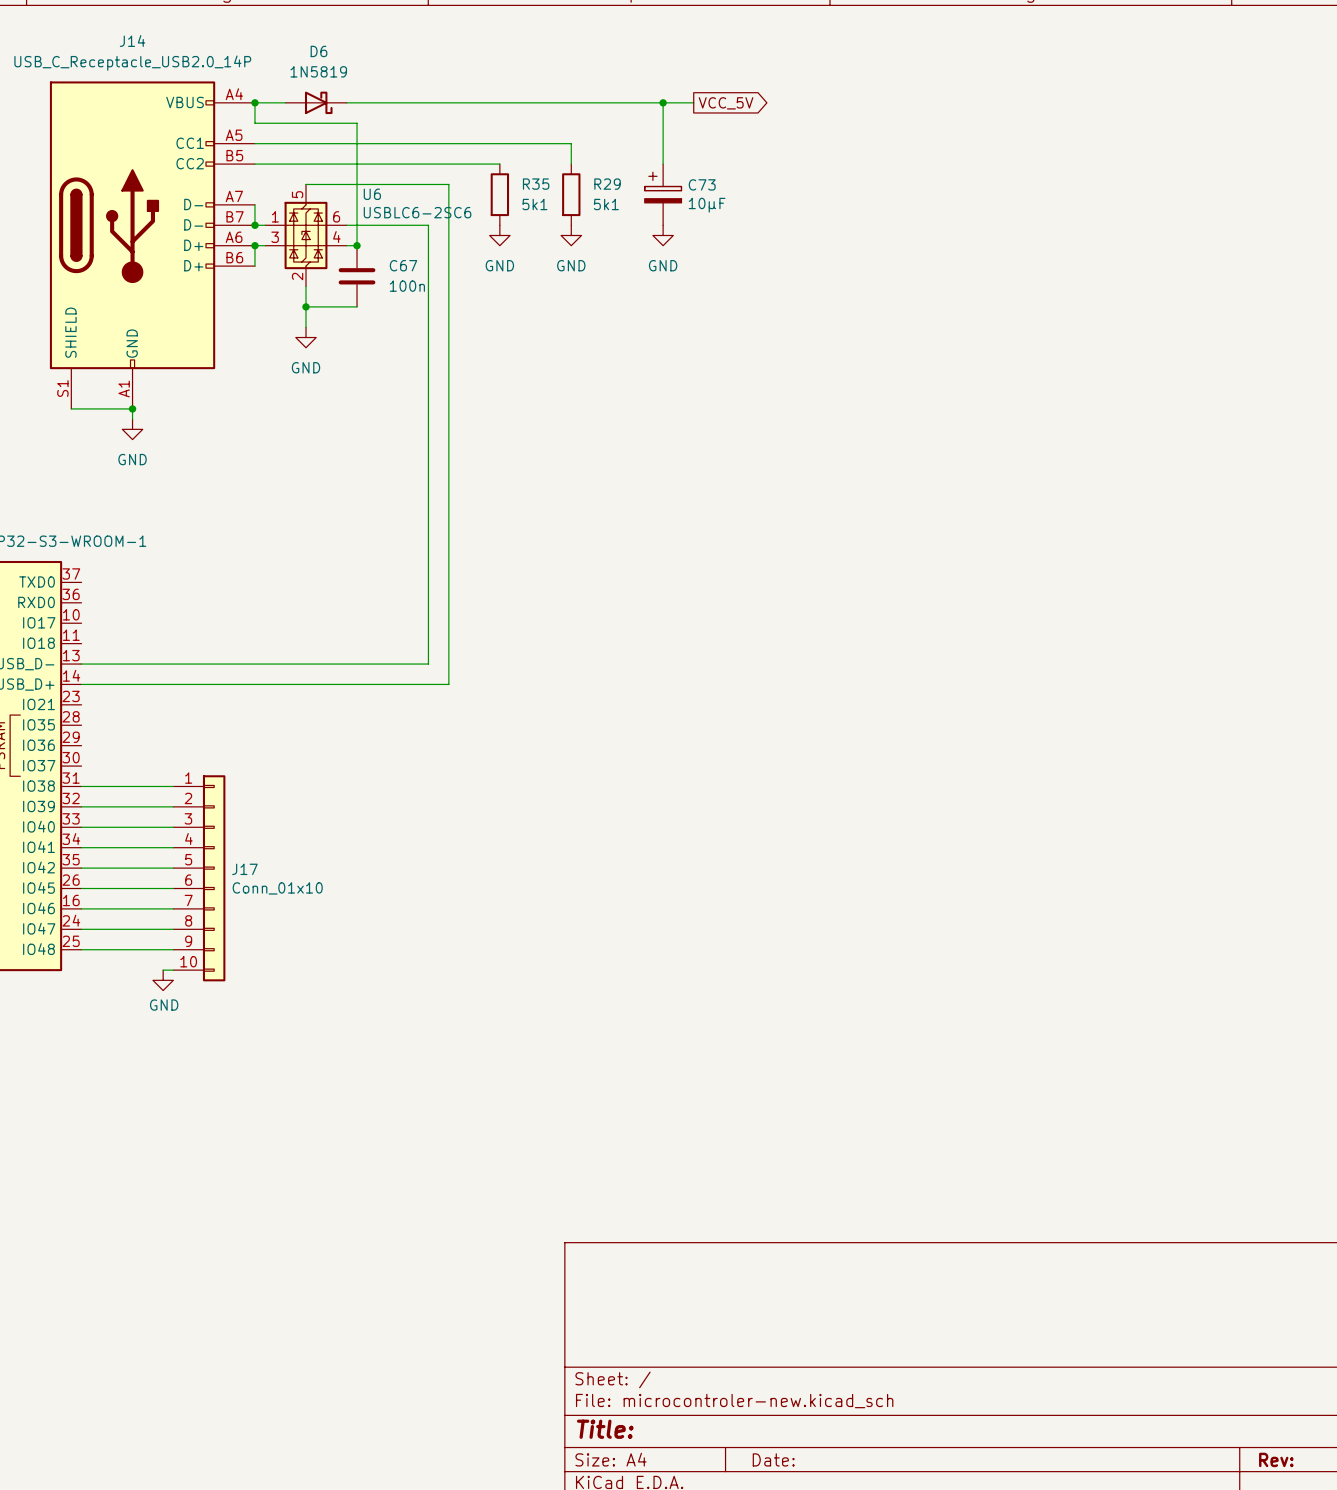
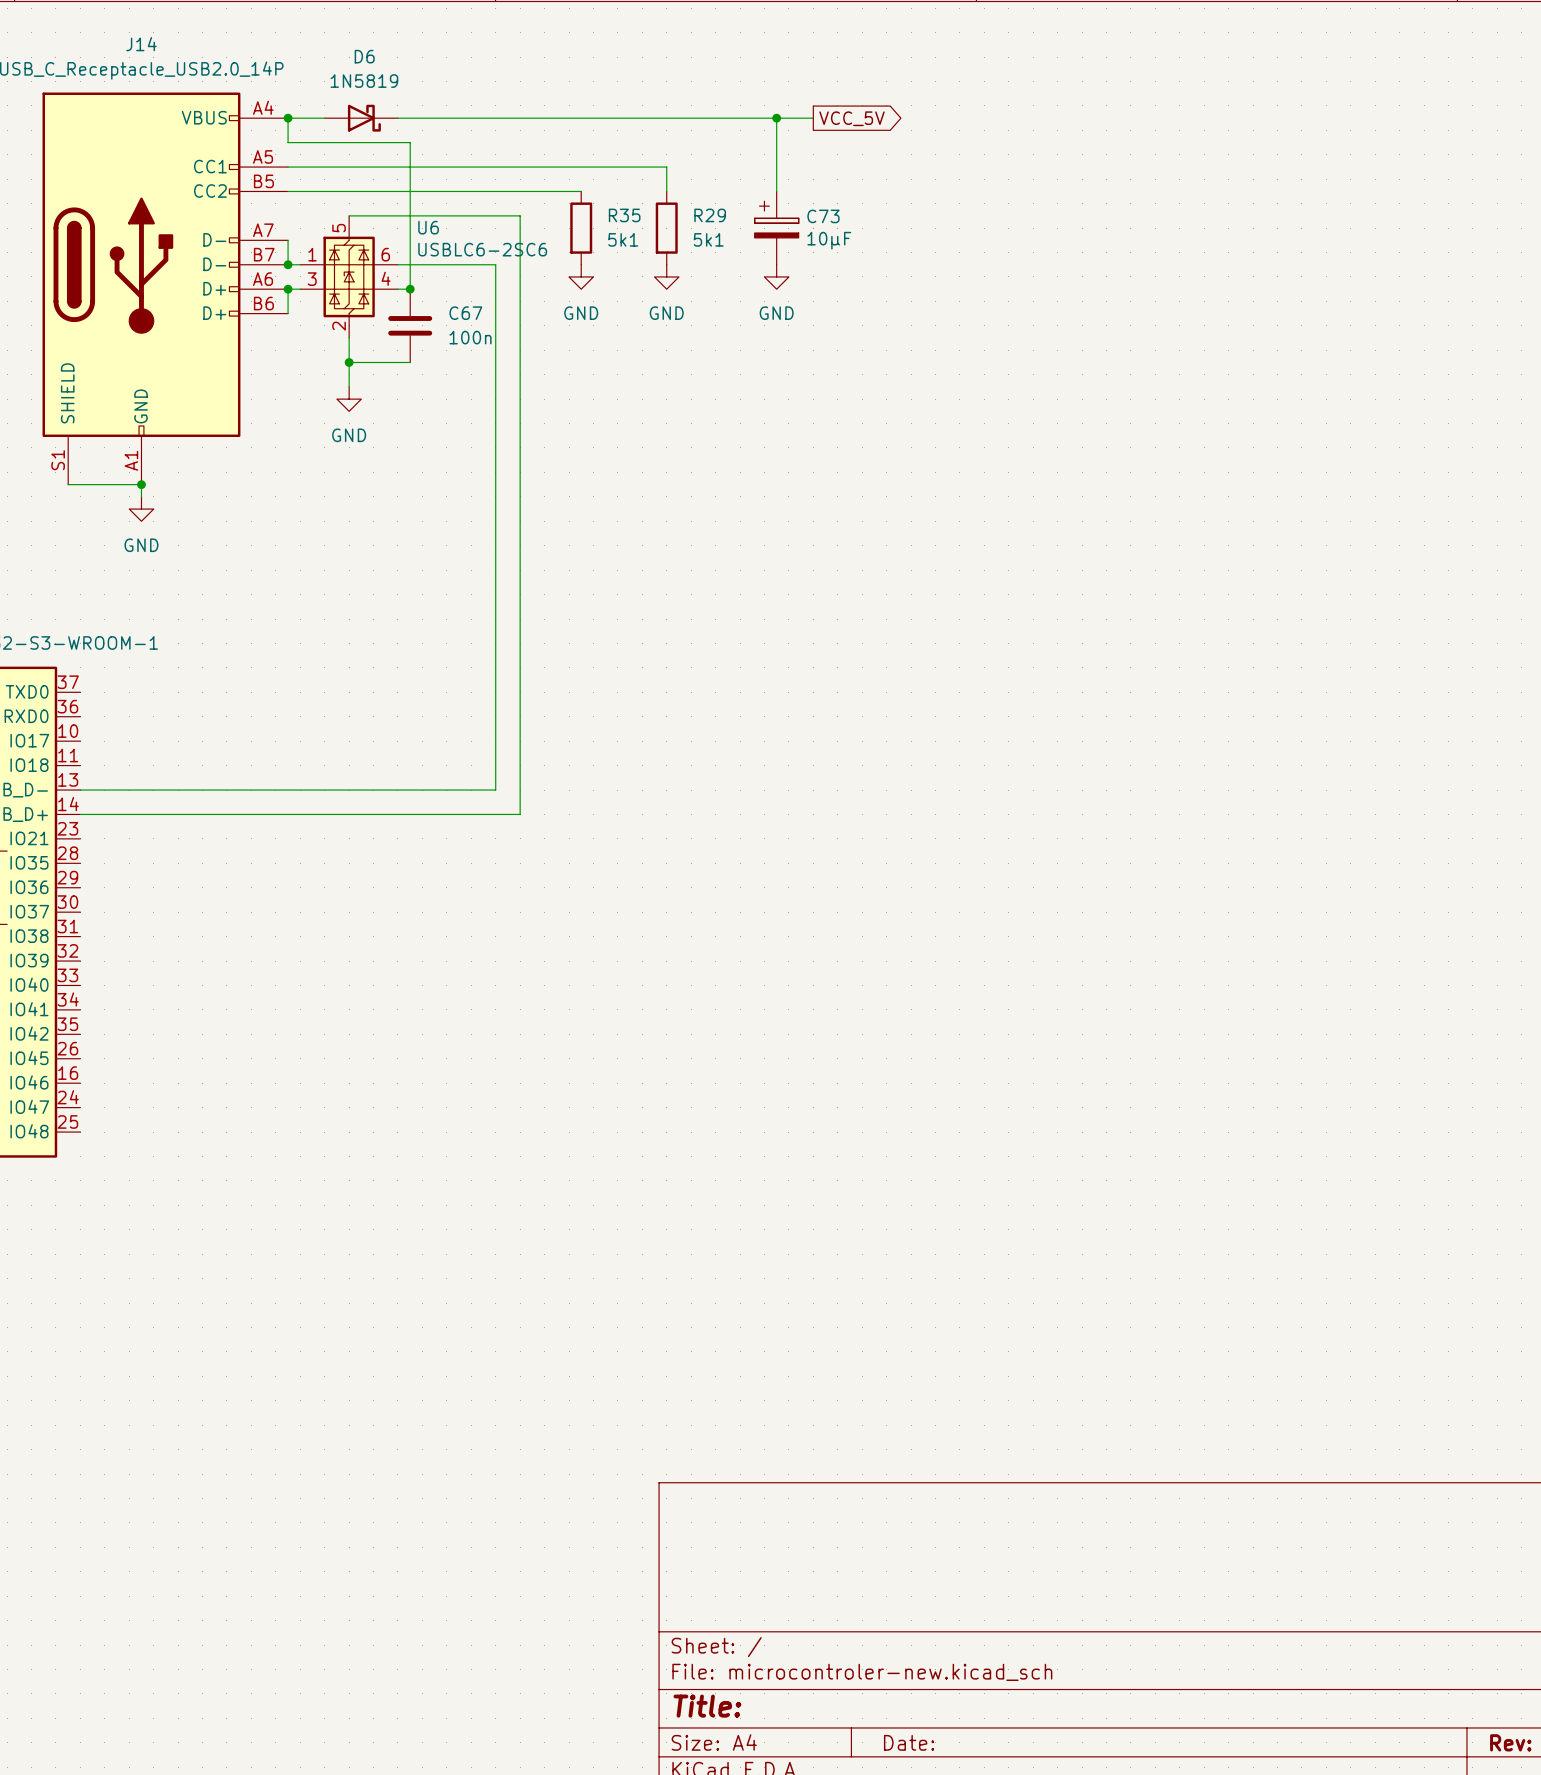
wire: (81, 786) (173, 786) -> none
wire: (81, 806) (173, 806) -> none
wire: (81, 827) (173, 827) -> none
wire: (81, 847) (173, 847) -> none
wire: (81, 868) (173, 868) -> none
J17: Conn_01x10 (199, 878) -> none
wire: (81, 888) (173, 888) -> none
wire: (81, 908) (173, 908) -> none
wire: (81, 929) (173, 929) -> none
wire: (81, 949) (173, 949) -> none
wire: (163, 970) (173, 970) -> none
power symbol: GND (163, 980) -> none

